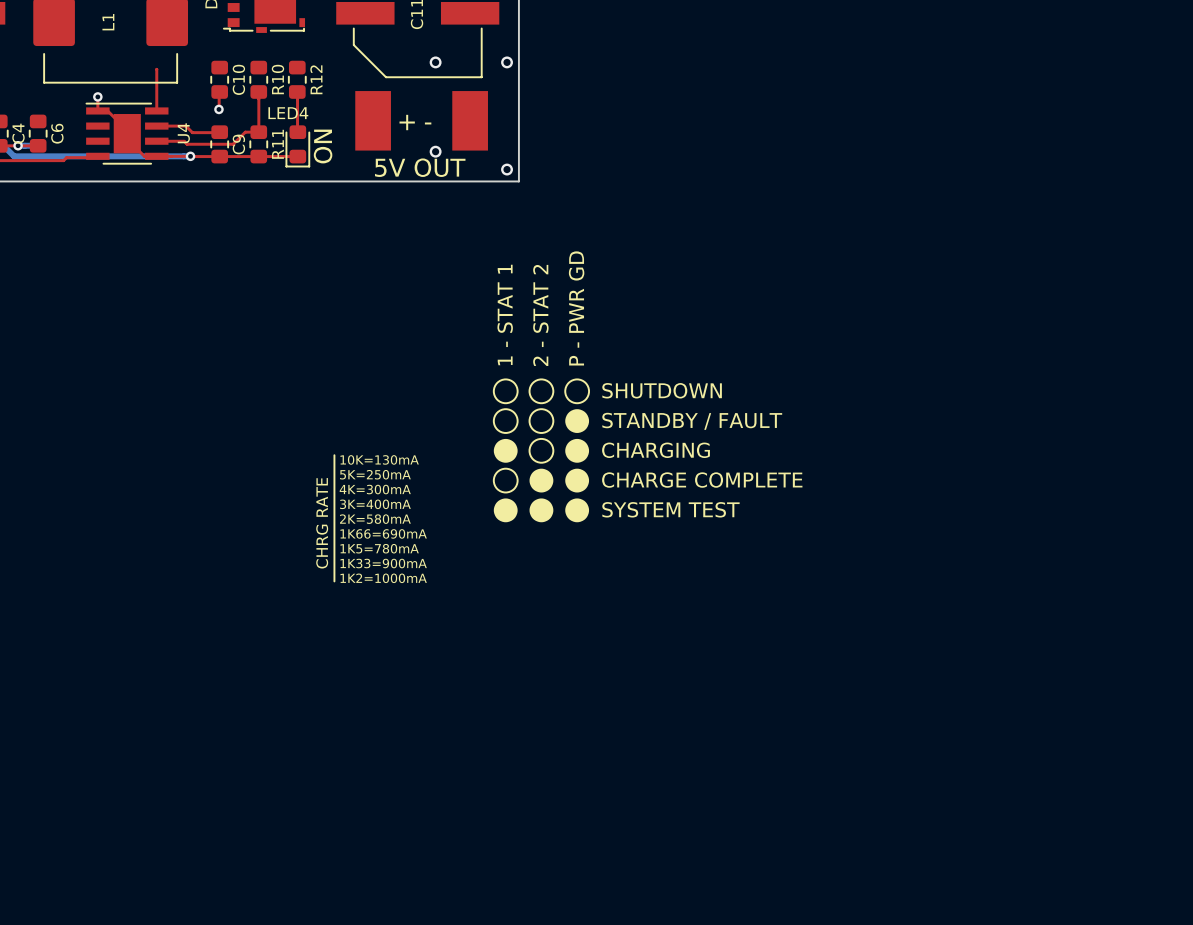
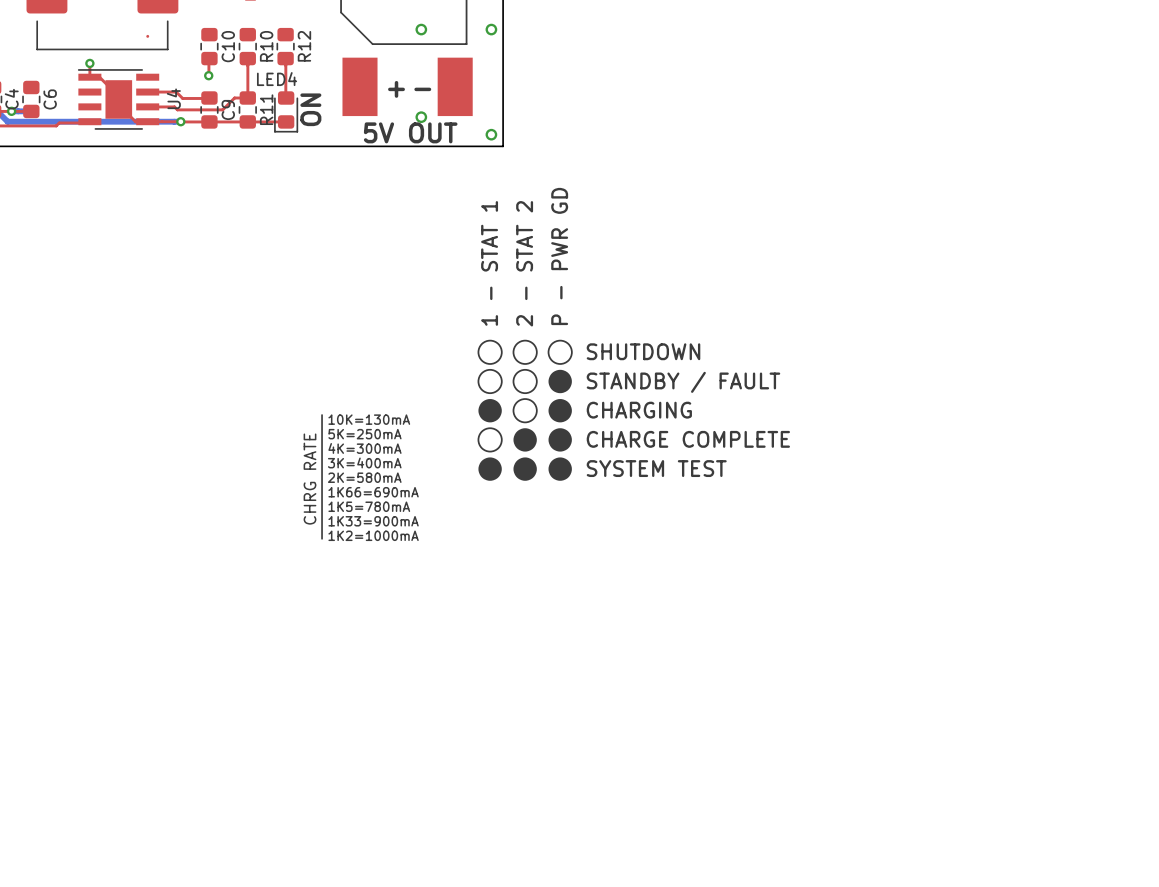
top track: (156, 69) (156, 110) -> none

